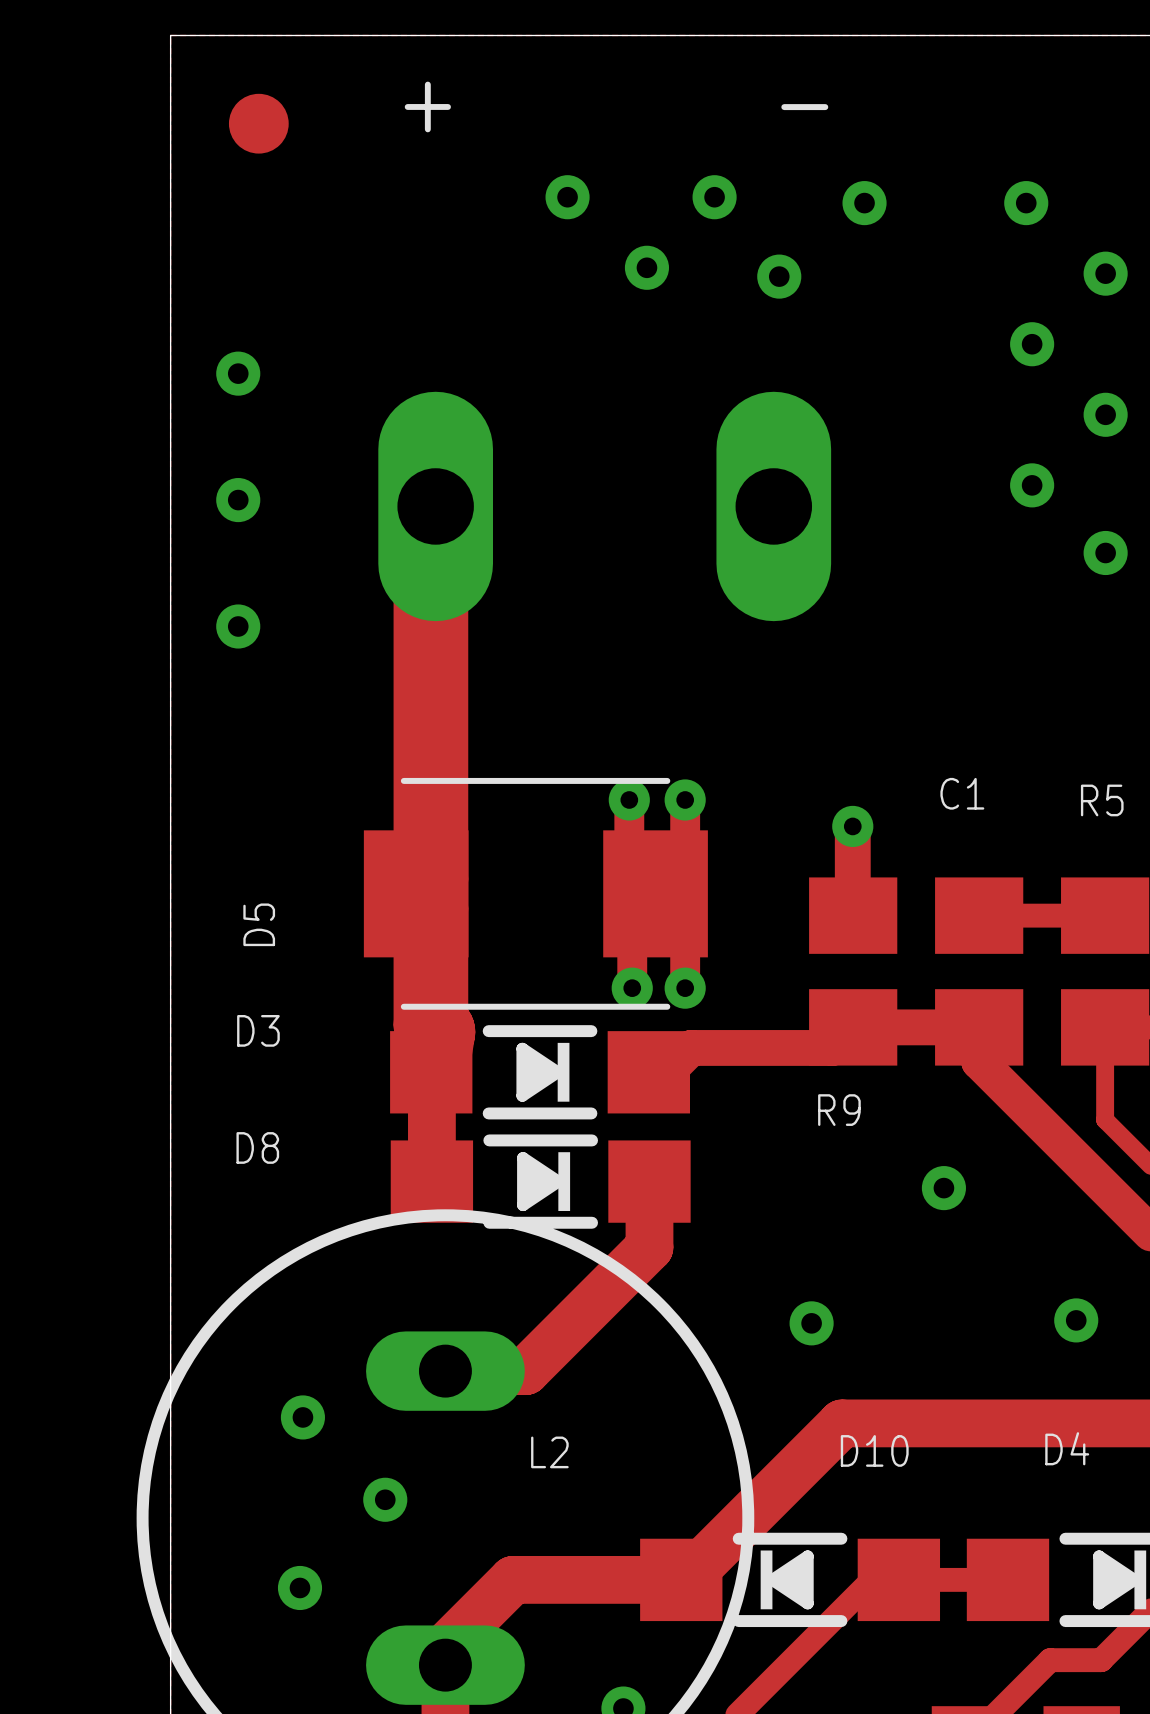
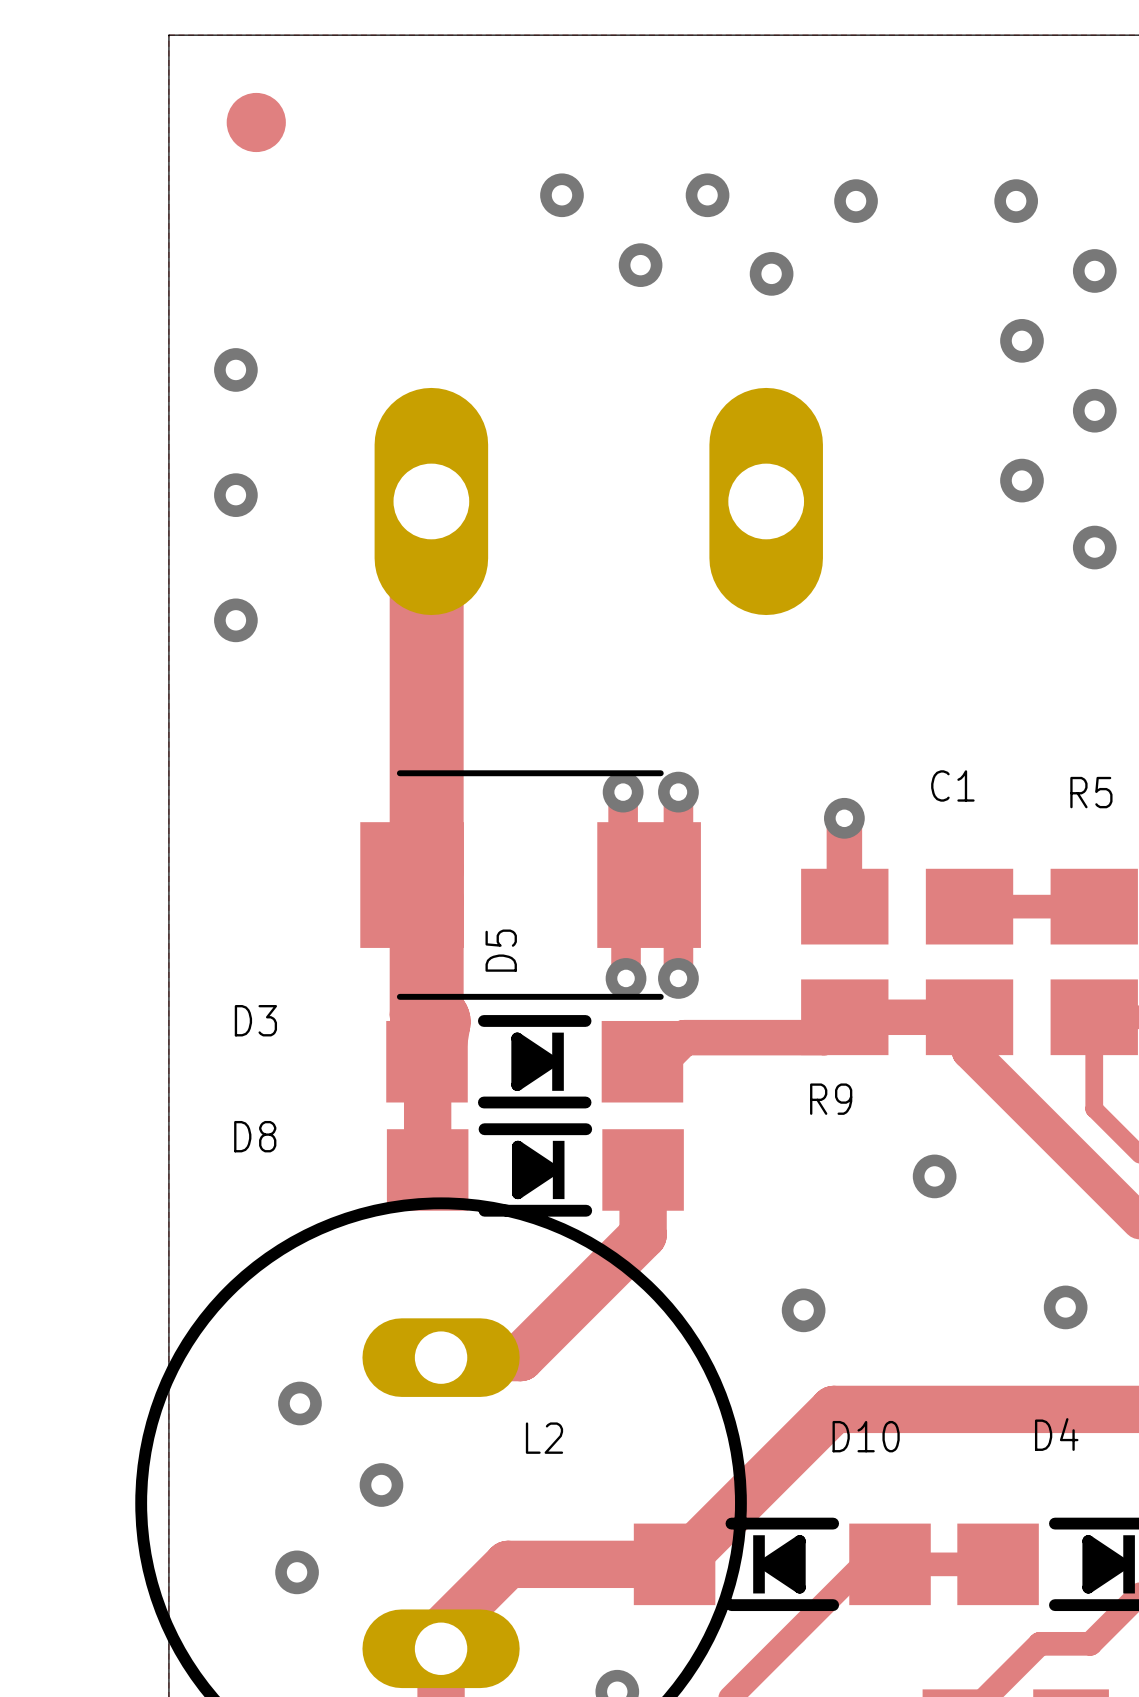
text: + (427, 106) -> none
text: - (804, 107) -> none
D5 name position: D5 (259, 924) -> D5 (501, 950)

